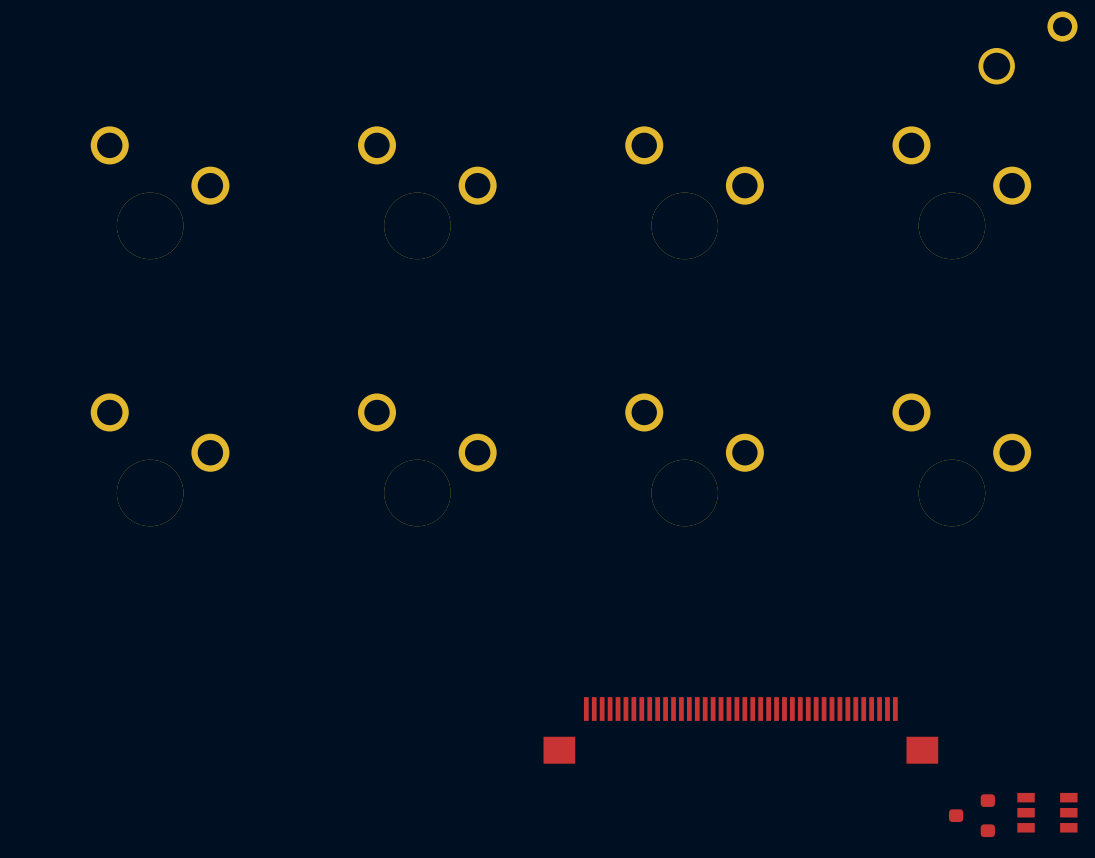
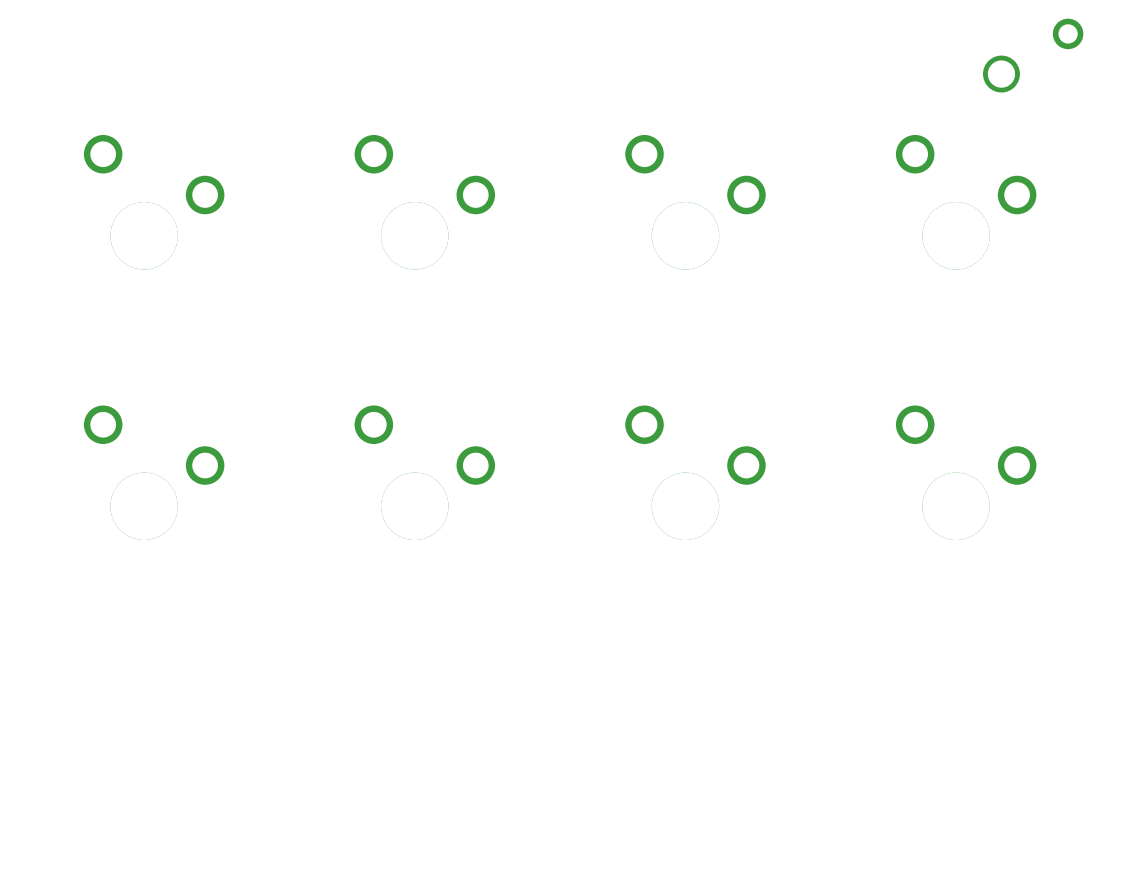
part: (740, 730) -> none
part: (1047, 812) -> none
part: (971, 815) -> none

